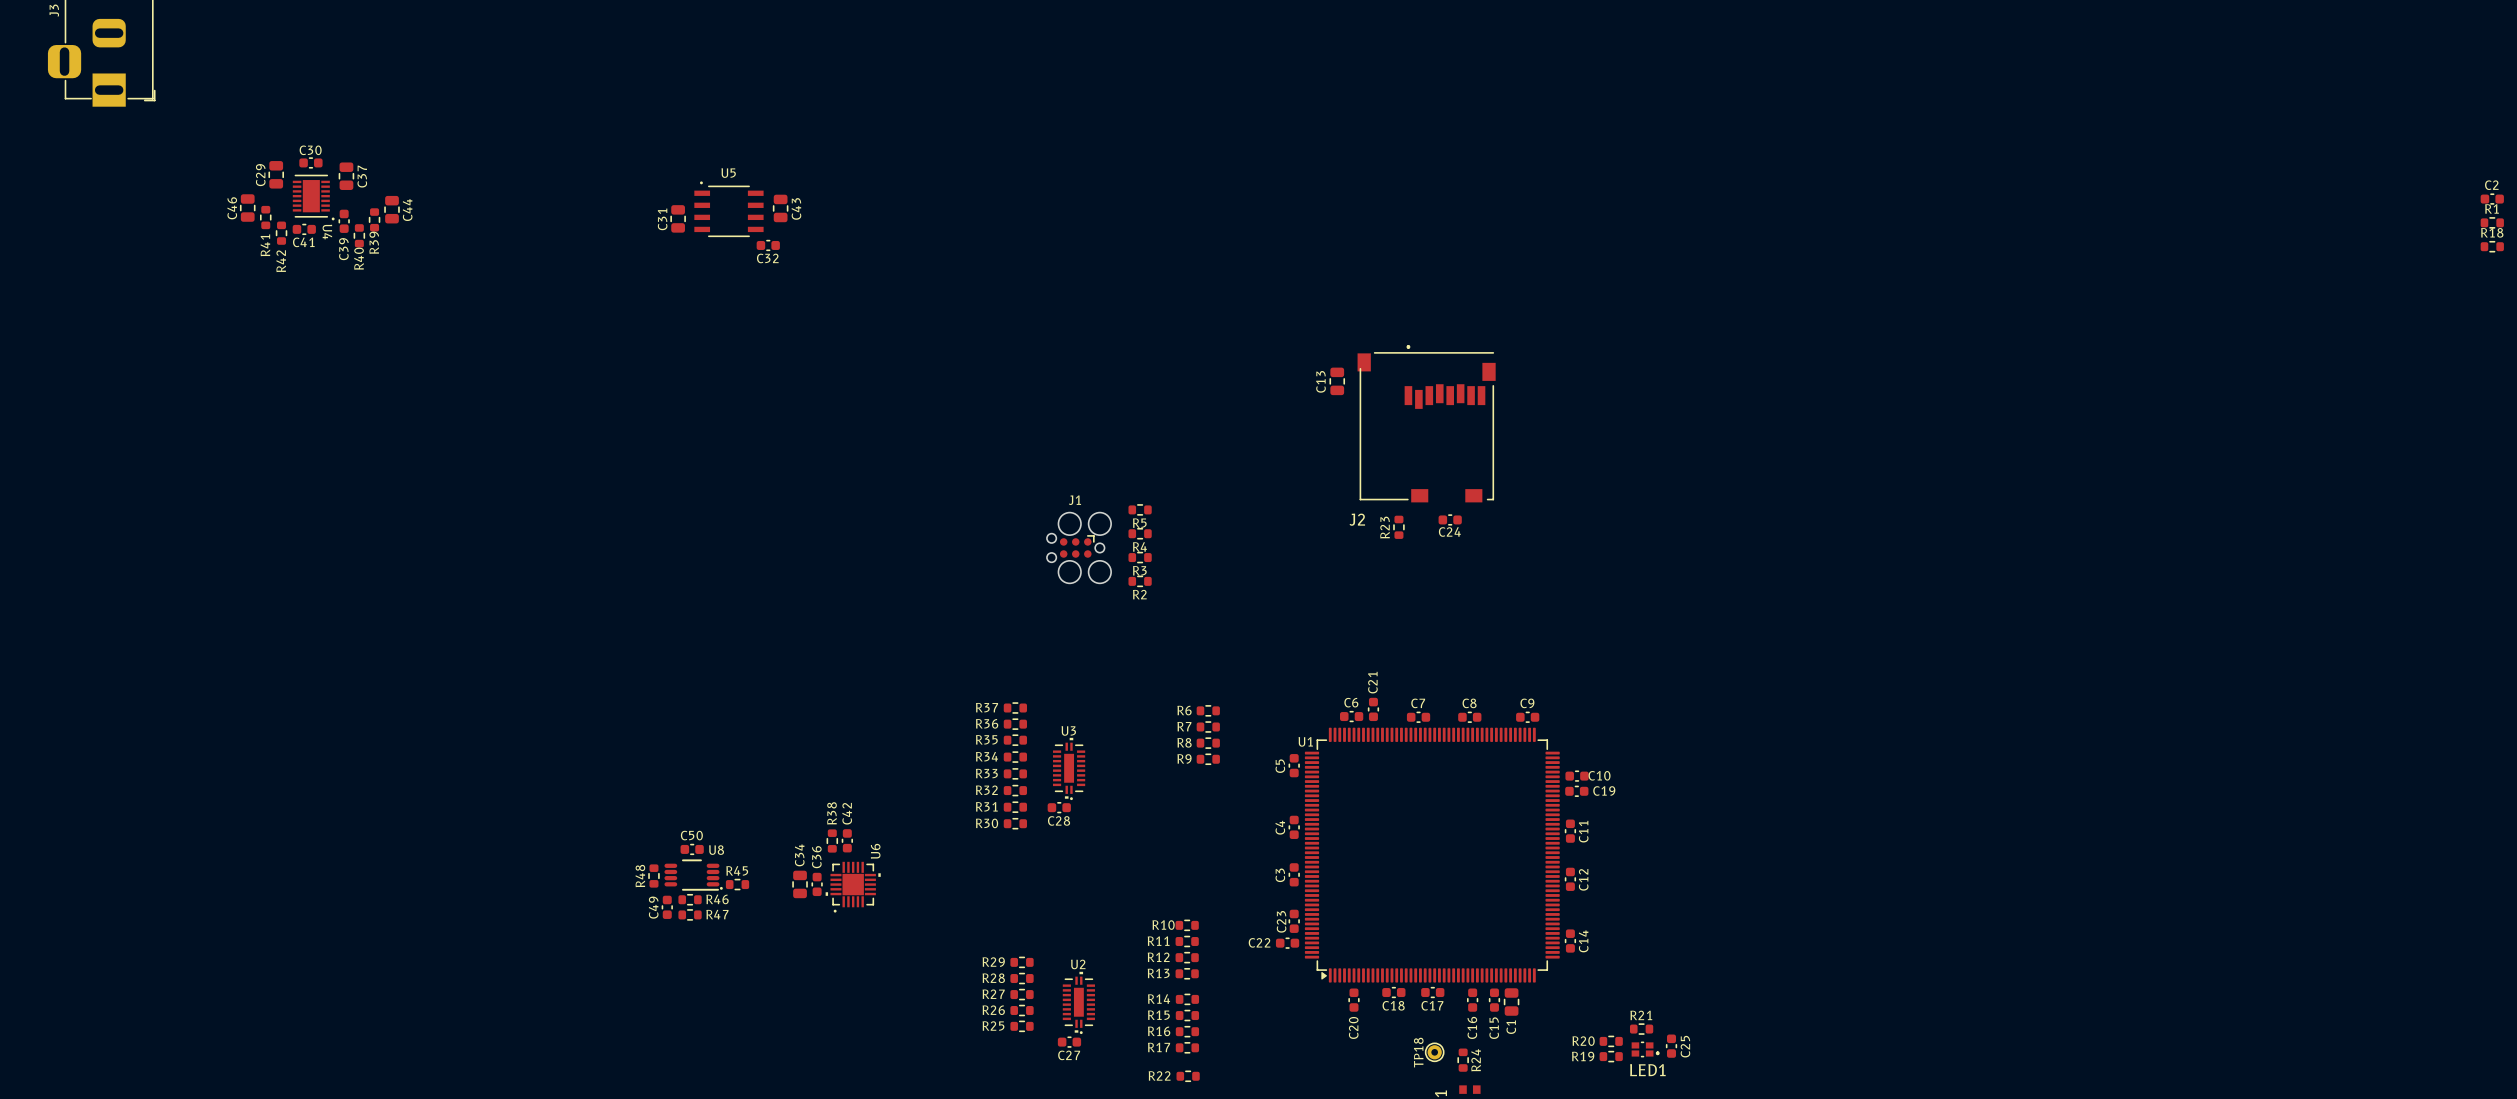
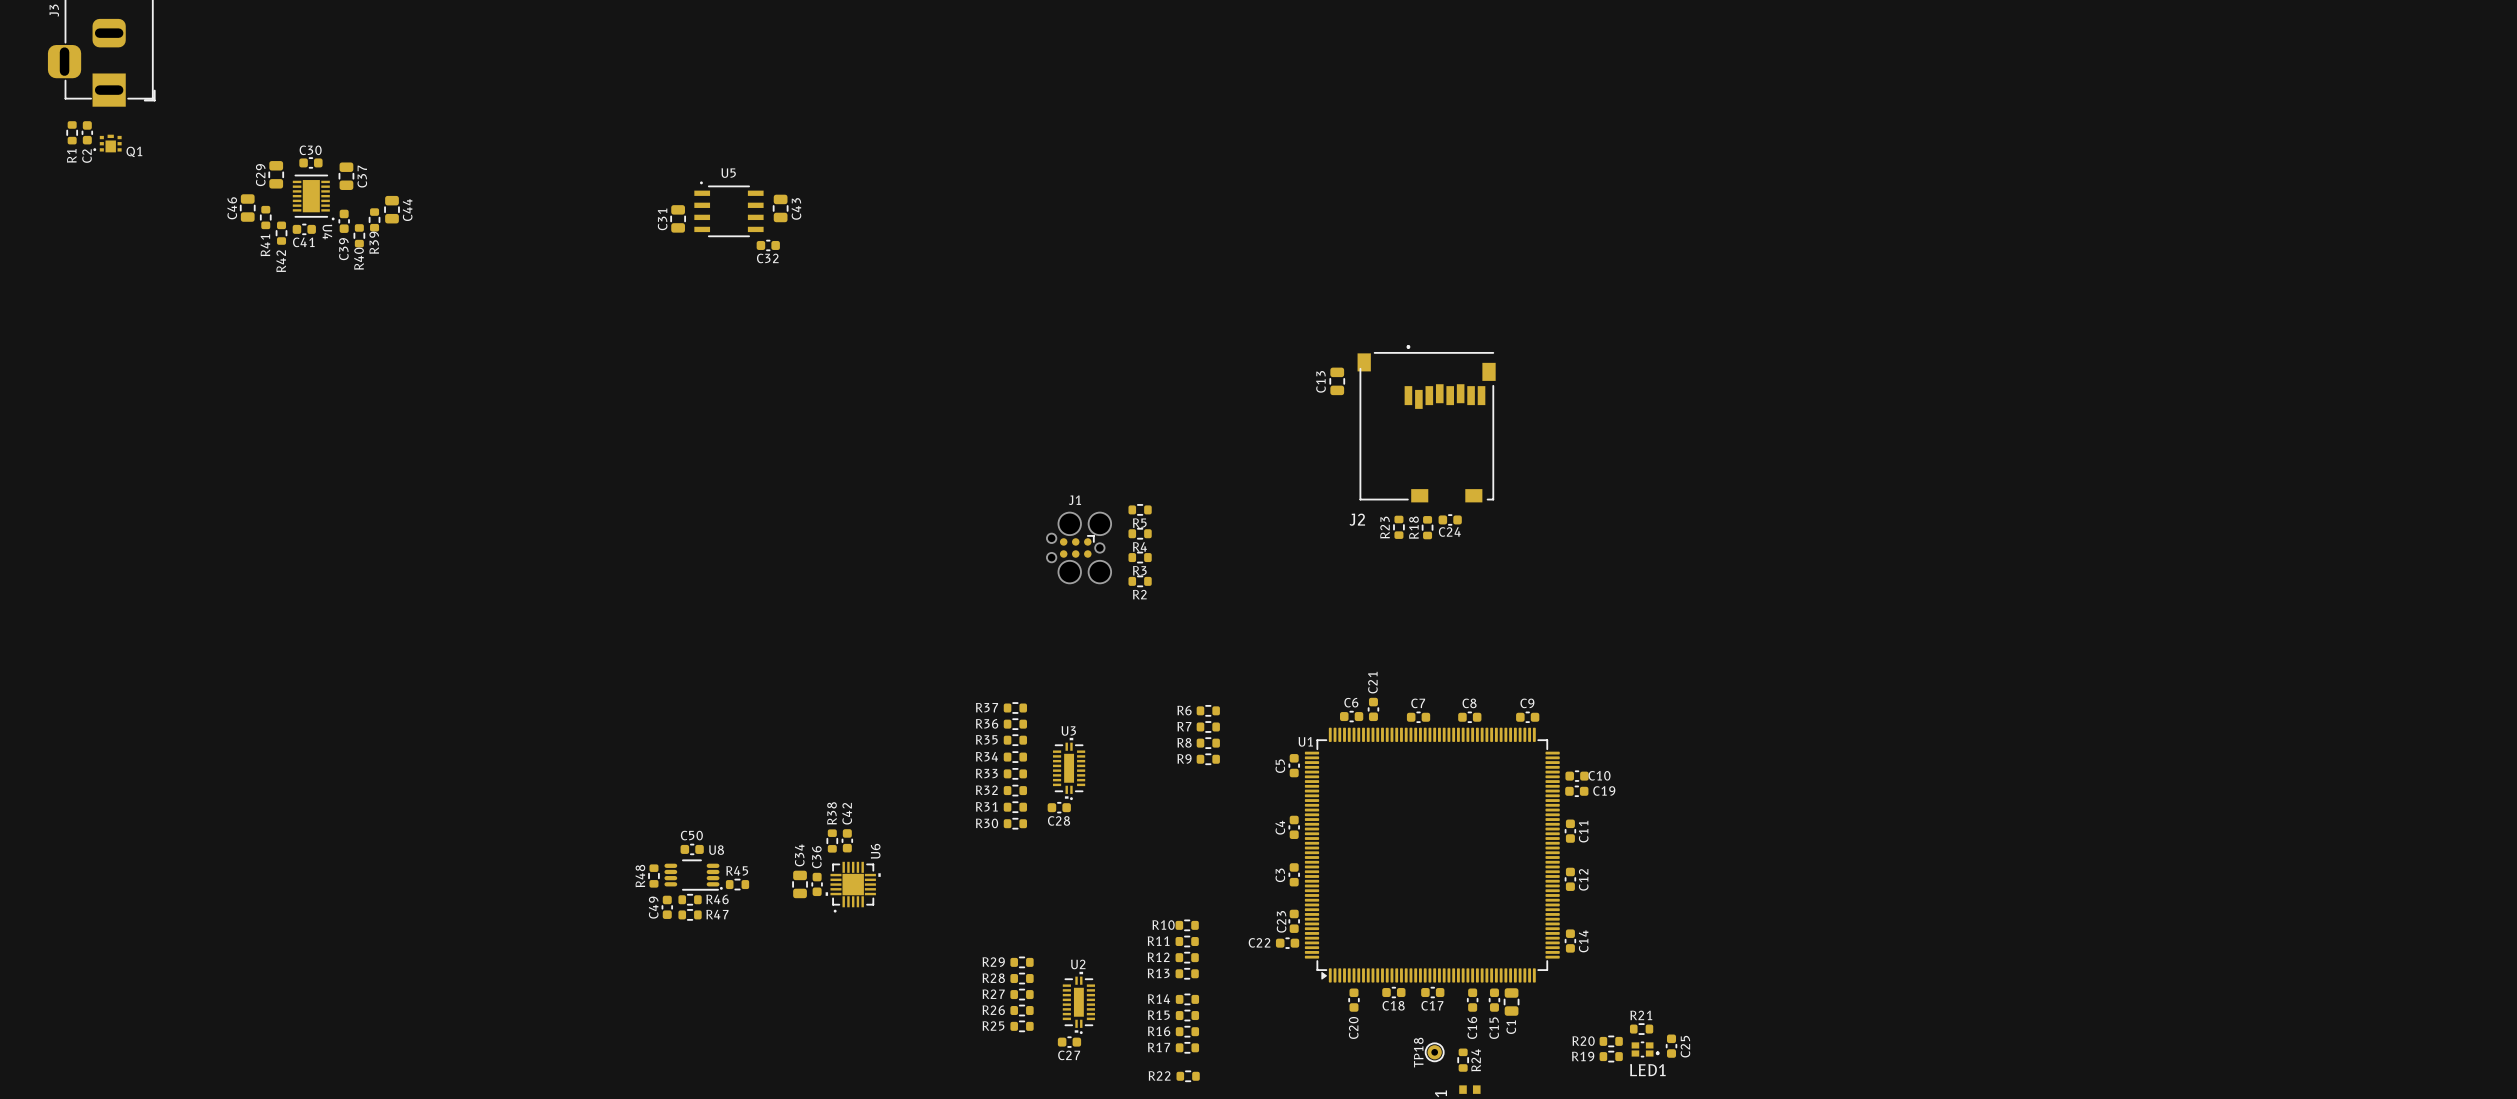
Q1: none -> (107, 143)
C2 name position: C2 (2491, 185) -> C2 (87, 156)
C2 rotation: 0° (2492, 199) -> 90° clockwise (87, 132)
C2 position: (2492, 199) -> (87, 132)
R1 name position: R1 (2492, 208) -> R1 (71, 155)
R1 rotation: 0° (2492, 222) -> 90° clockwise (72, 132)
R1 position: (2492, 222) -> (72, 132)
R18 rotation: 0° (2492, 246) -> 90° clockwise (1427, 527)
R18 position: (2492, 246) -> (1427, 527)

